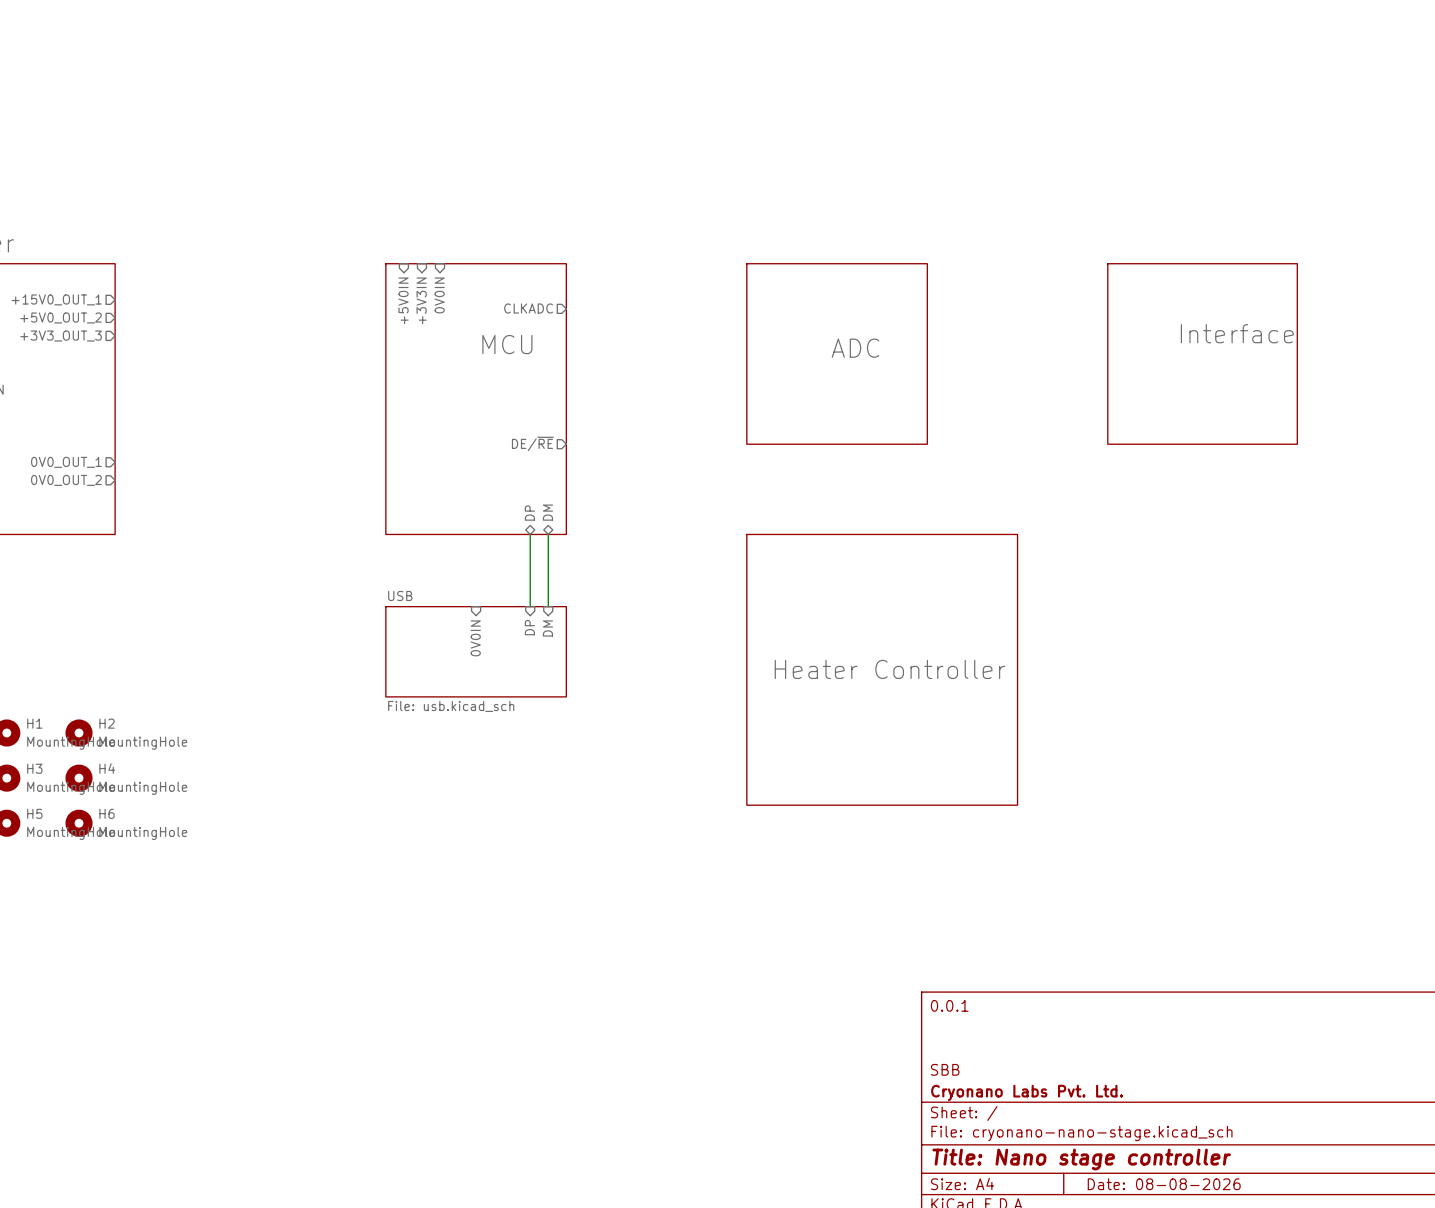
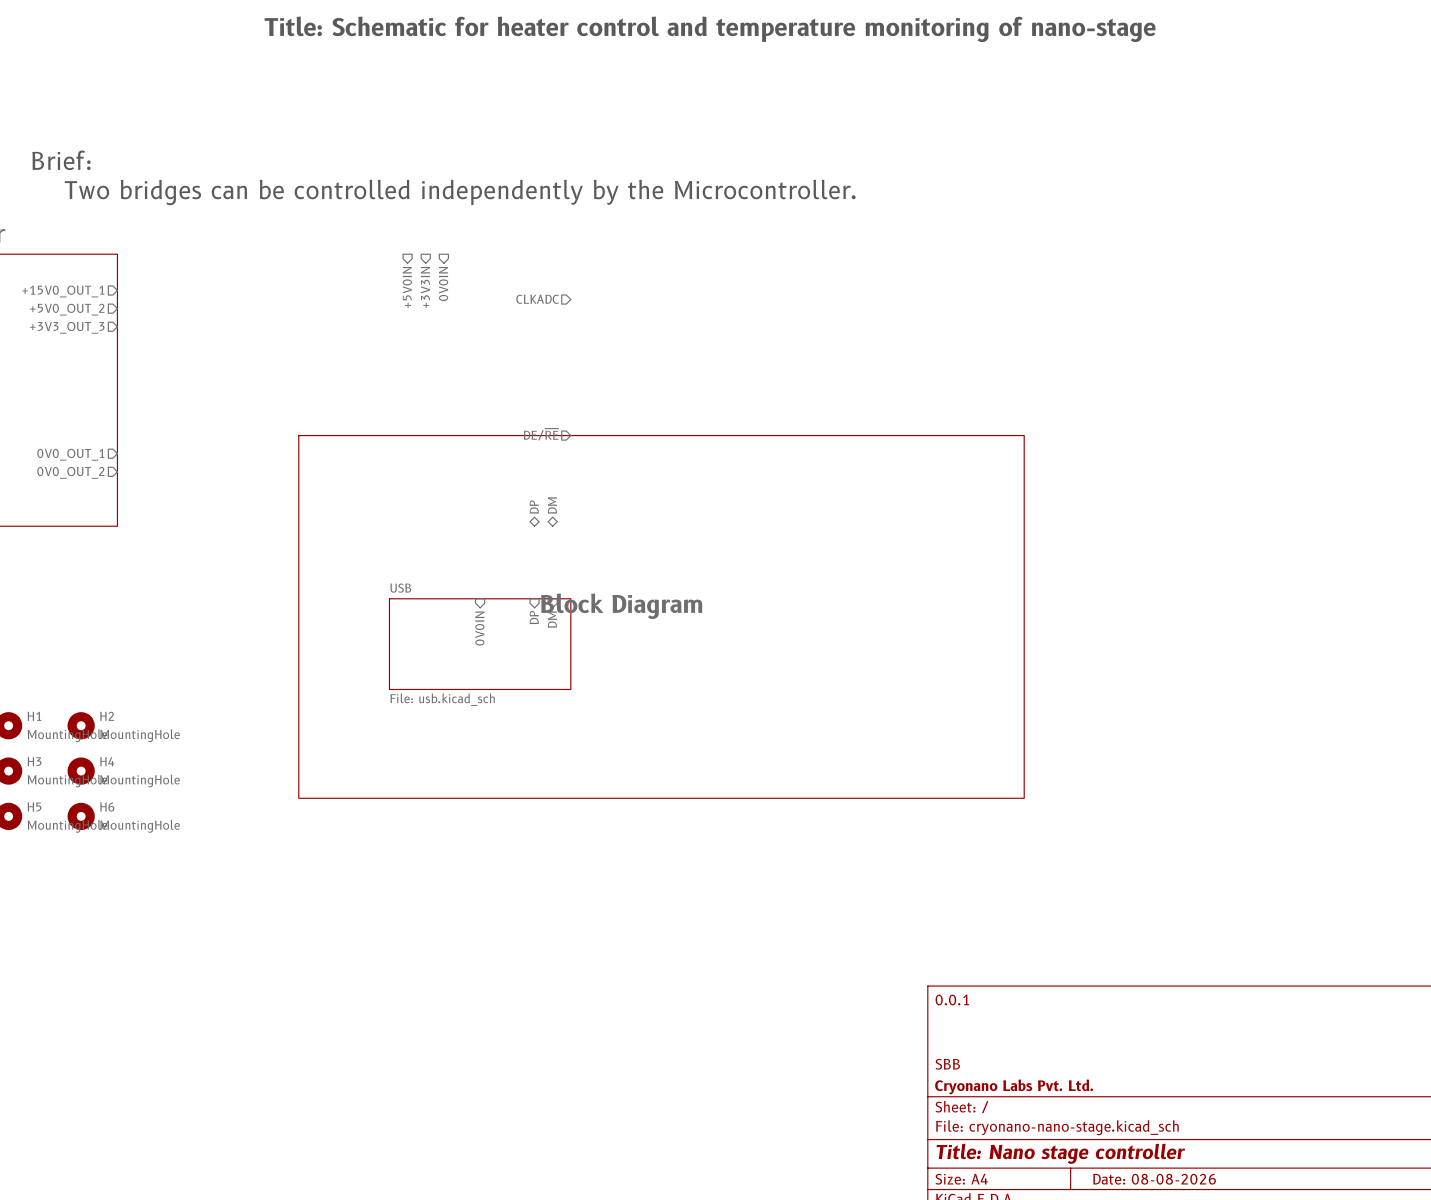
text: none -> Title: Schematic for heater control and temperature monitoring of nano-stage (710, 29)
text: none -> Brief: (61, 160)
text: none -> Two bridges can be controlled independently by the Microcontroller. (460, 192)
sheet ADC: (837, 353) -> none
sheet Interface: (1202, 353) -> none
sheet MCU: (476, 399) -> none
wire: (530, 534) (530, 606) -> none
wire: (548, 534) (548, 606) -> none
sheet Block Diagram: none -> (661, 616)
sheet Heater Controller: (882, 669) -> none

